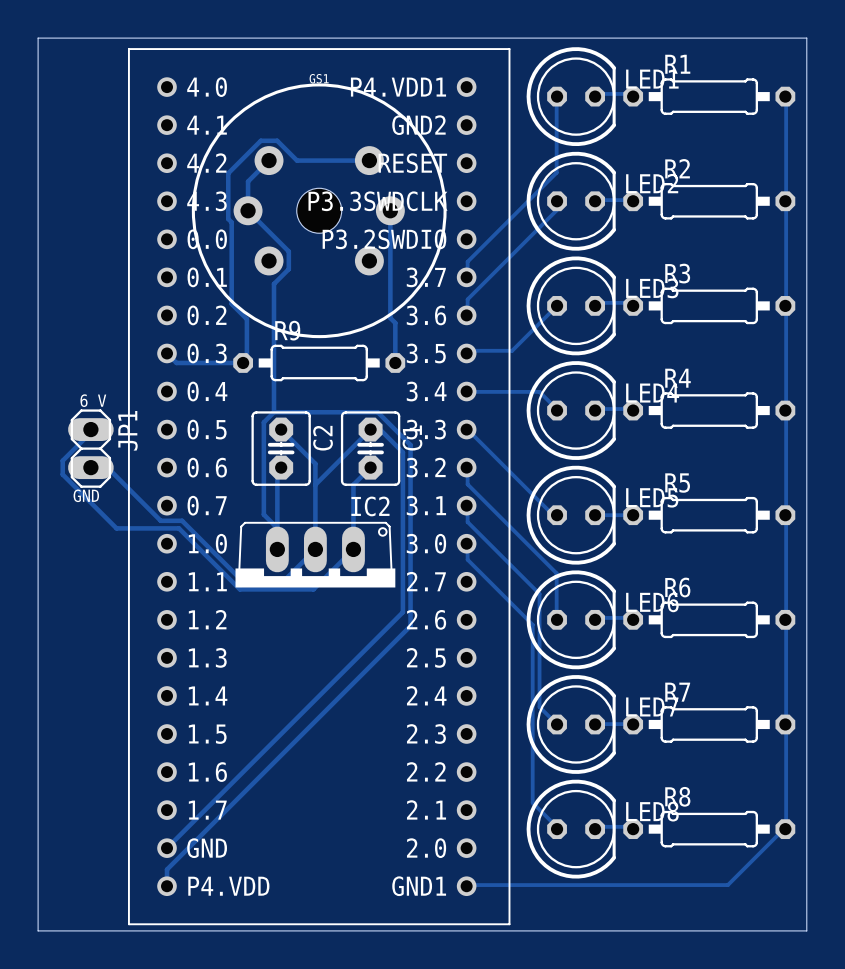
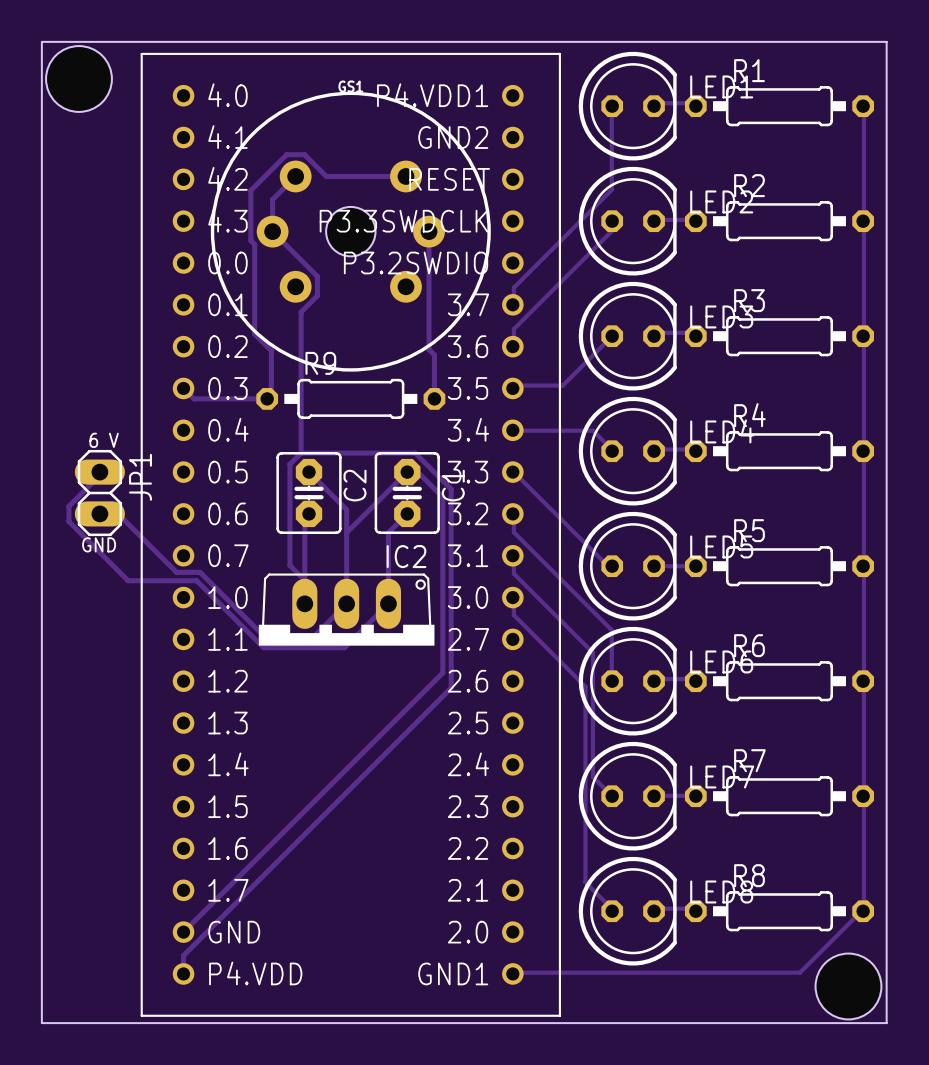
hole: none -> (78, 78)
hole: none -> (848, 986)

